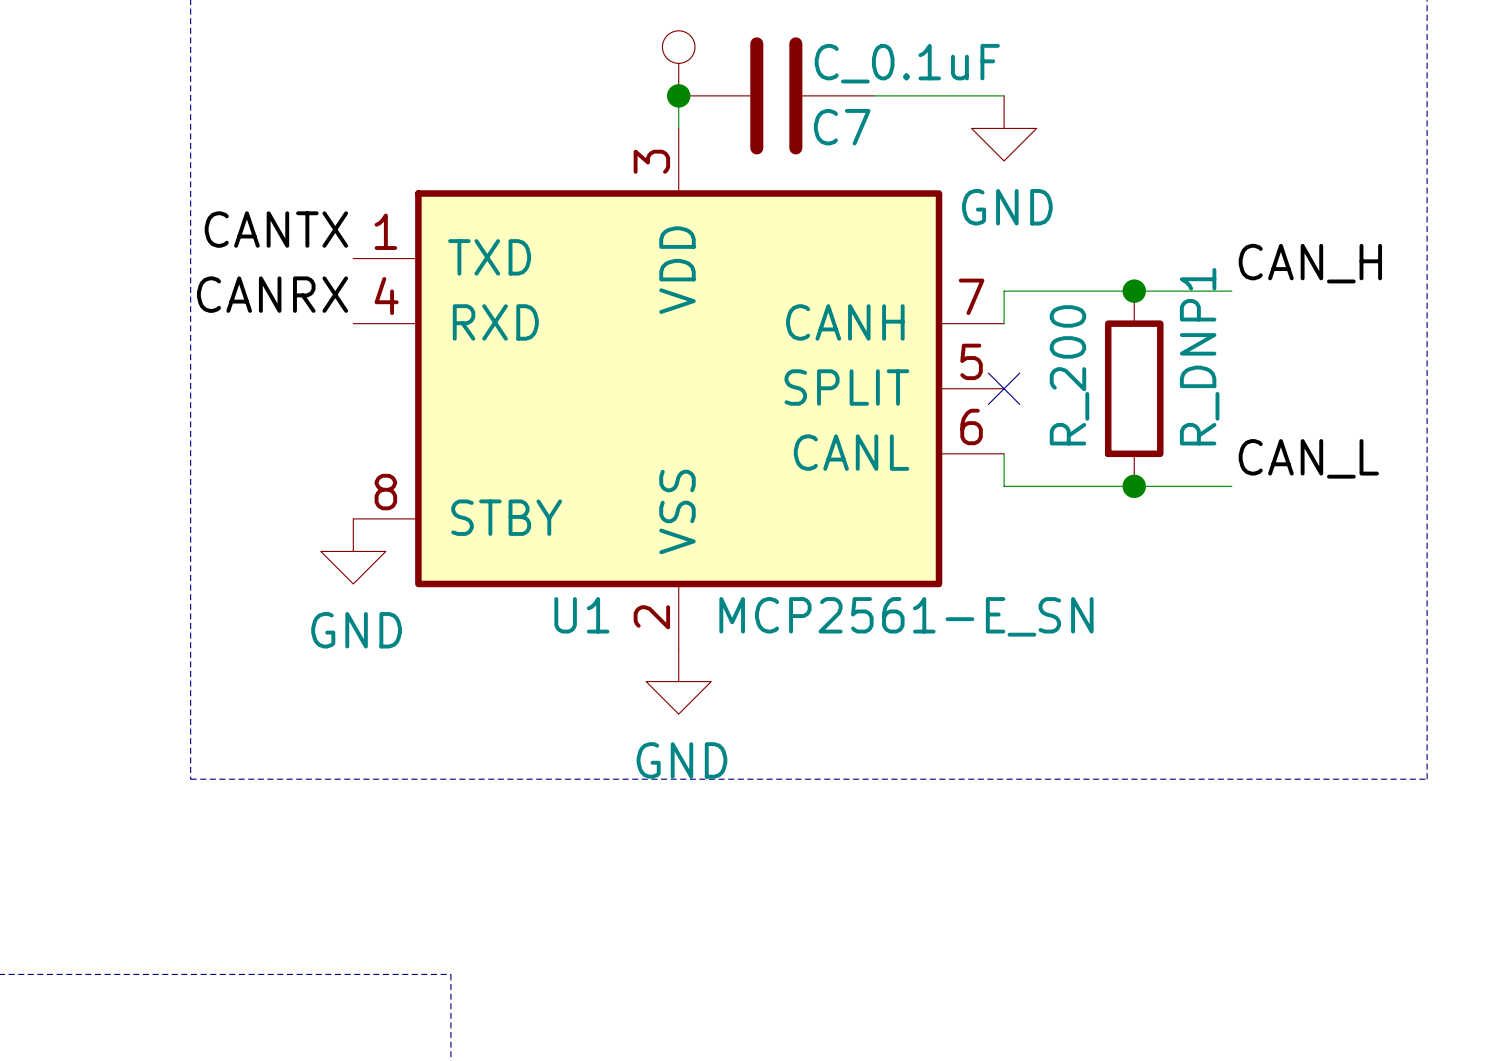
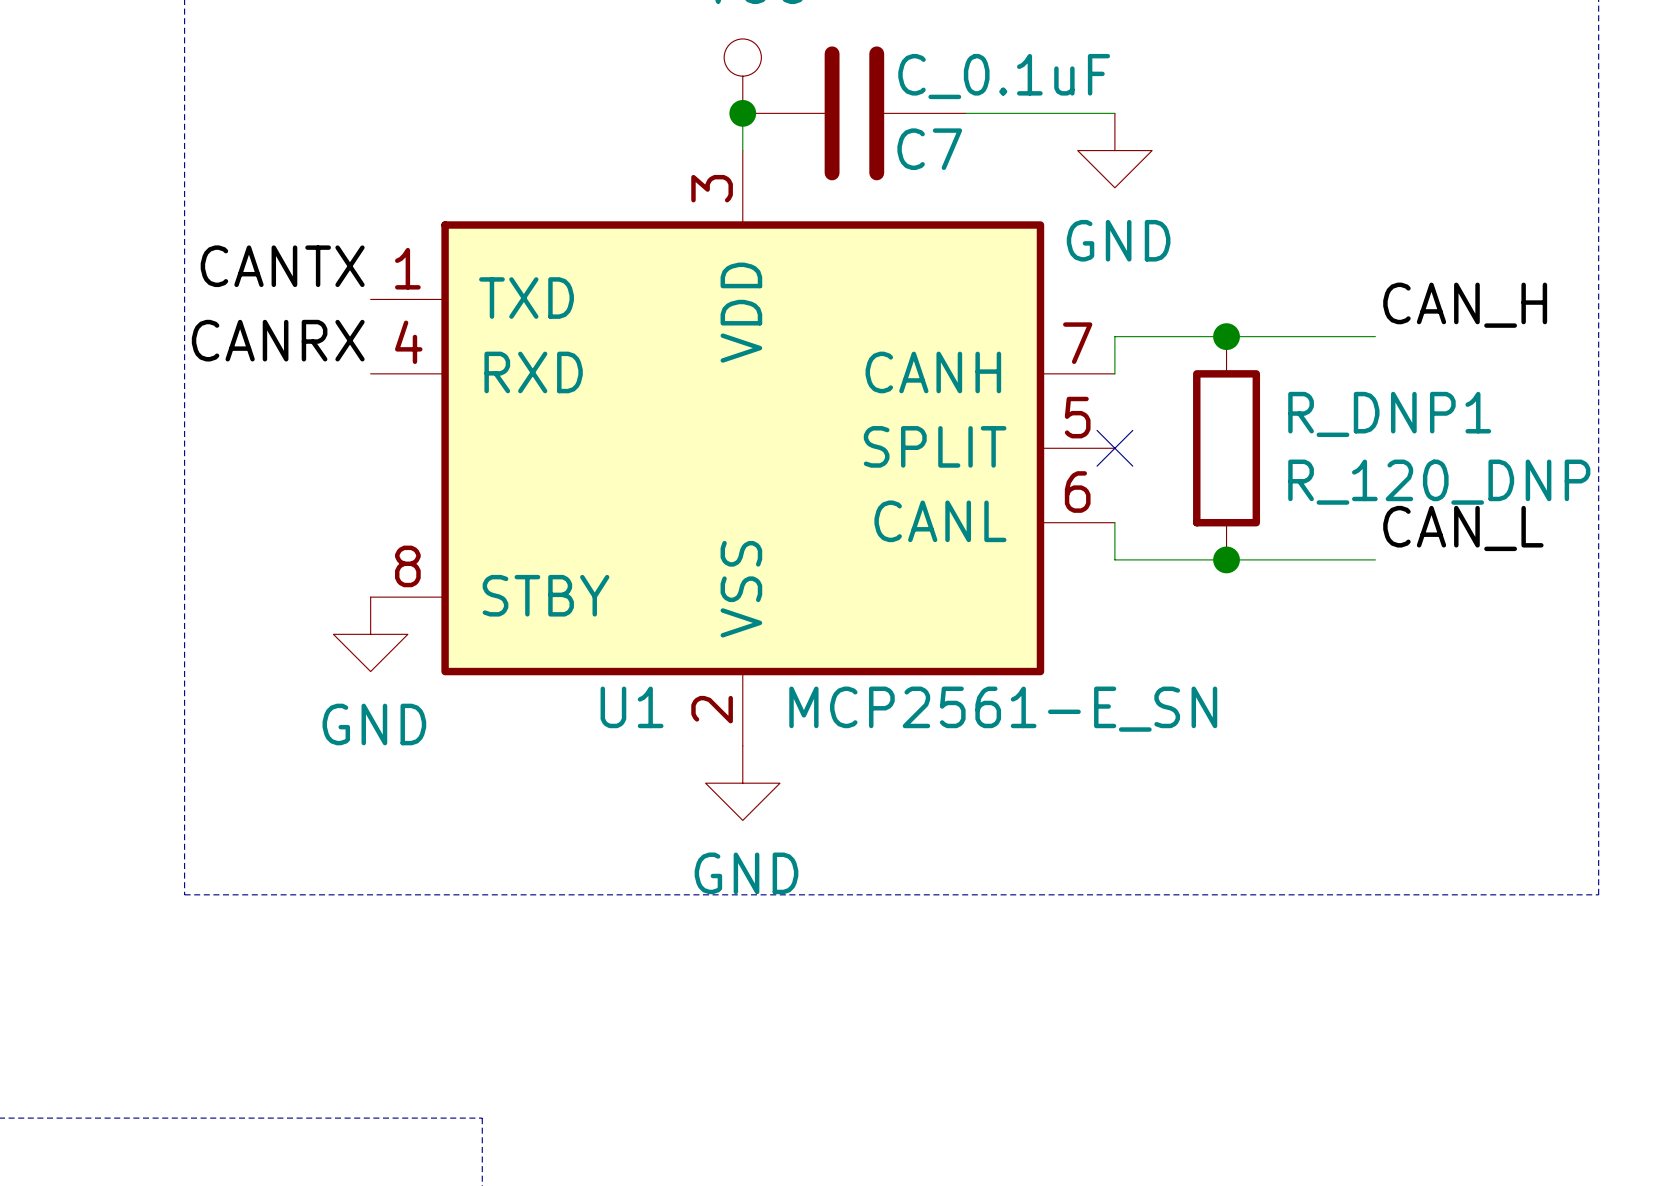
junction position: (1134, 291) -> (1226, 336)
R_DNP1 name rotation: 0° (1199, 356) -> 90° clockwise (1389, 414)
R_DNP1 value: R_200 (1069, 375) -> R_120_DNP (1439, 482)
R_DNP1 position: (1134, 388) -> (1226, 448)
junction position: (1134, 486) -> (1226, 559)

